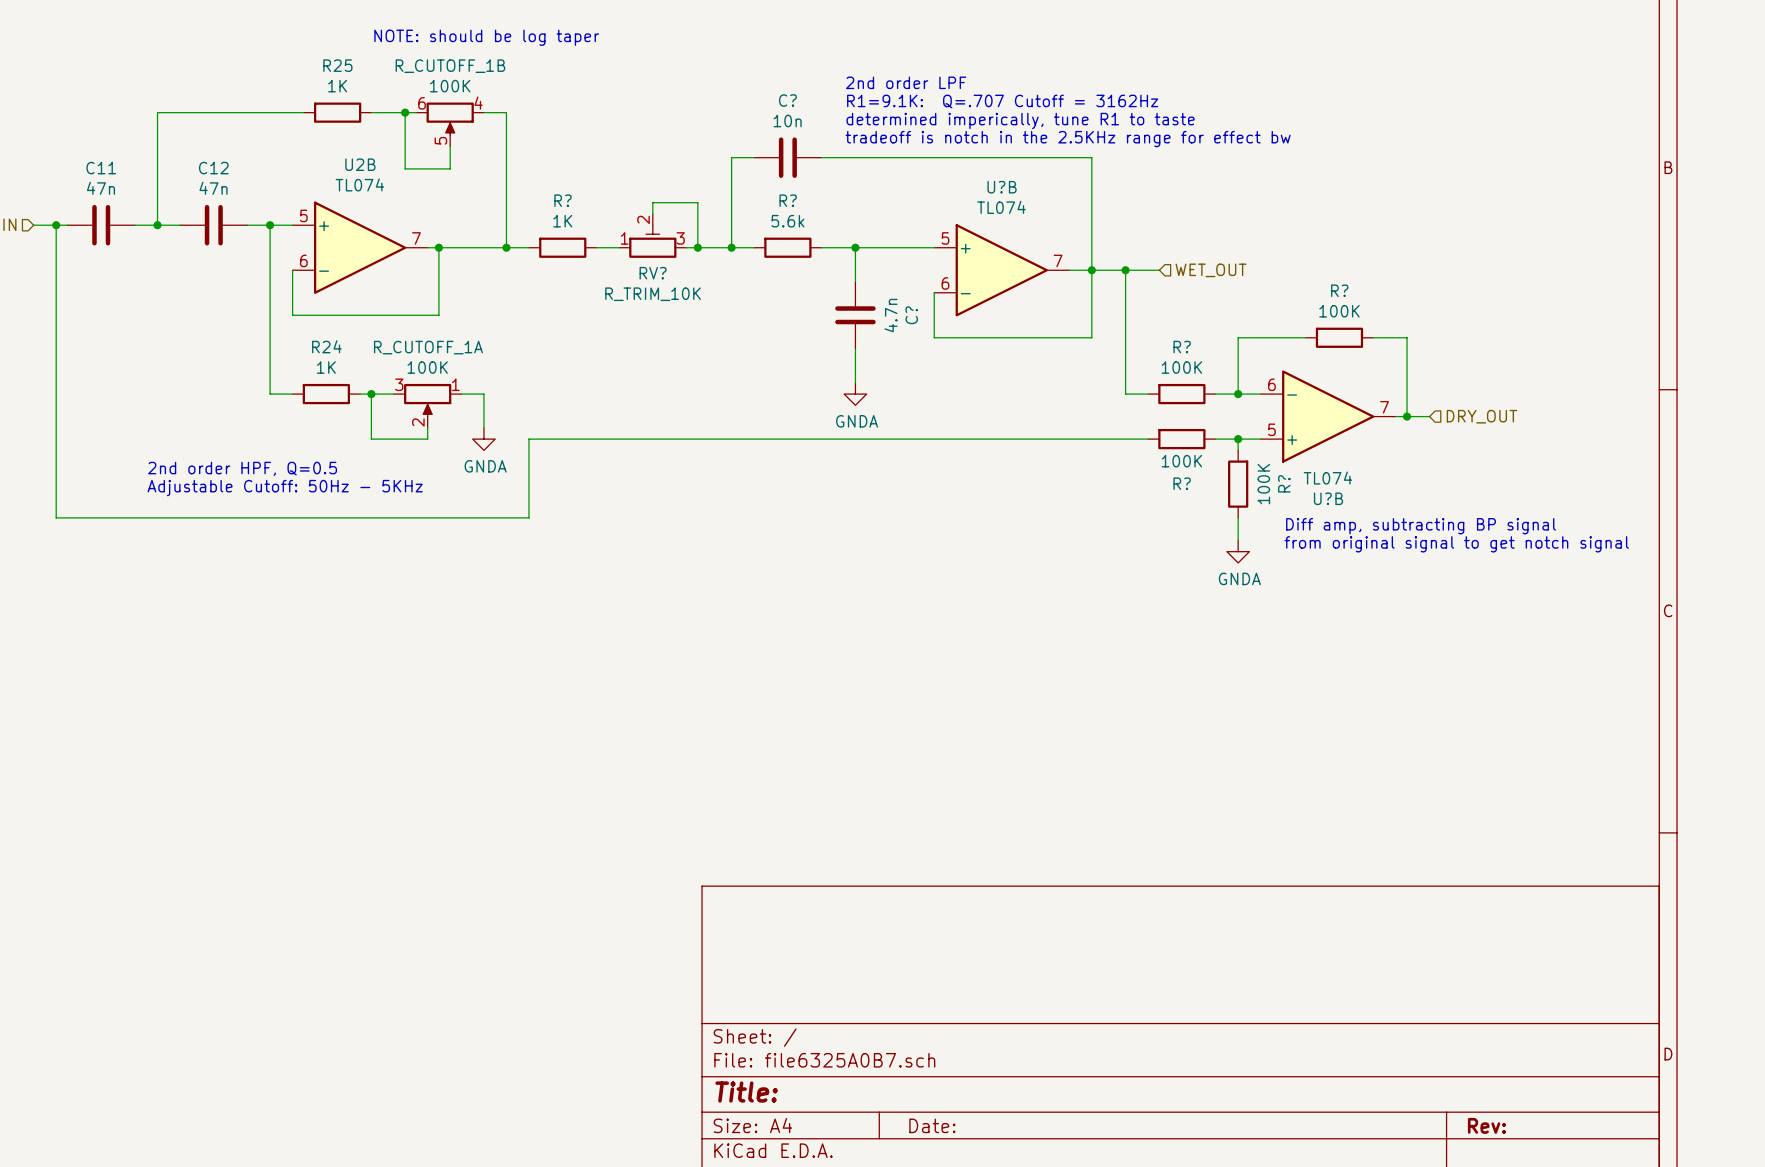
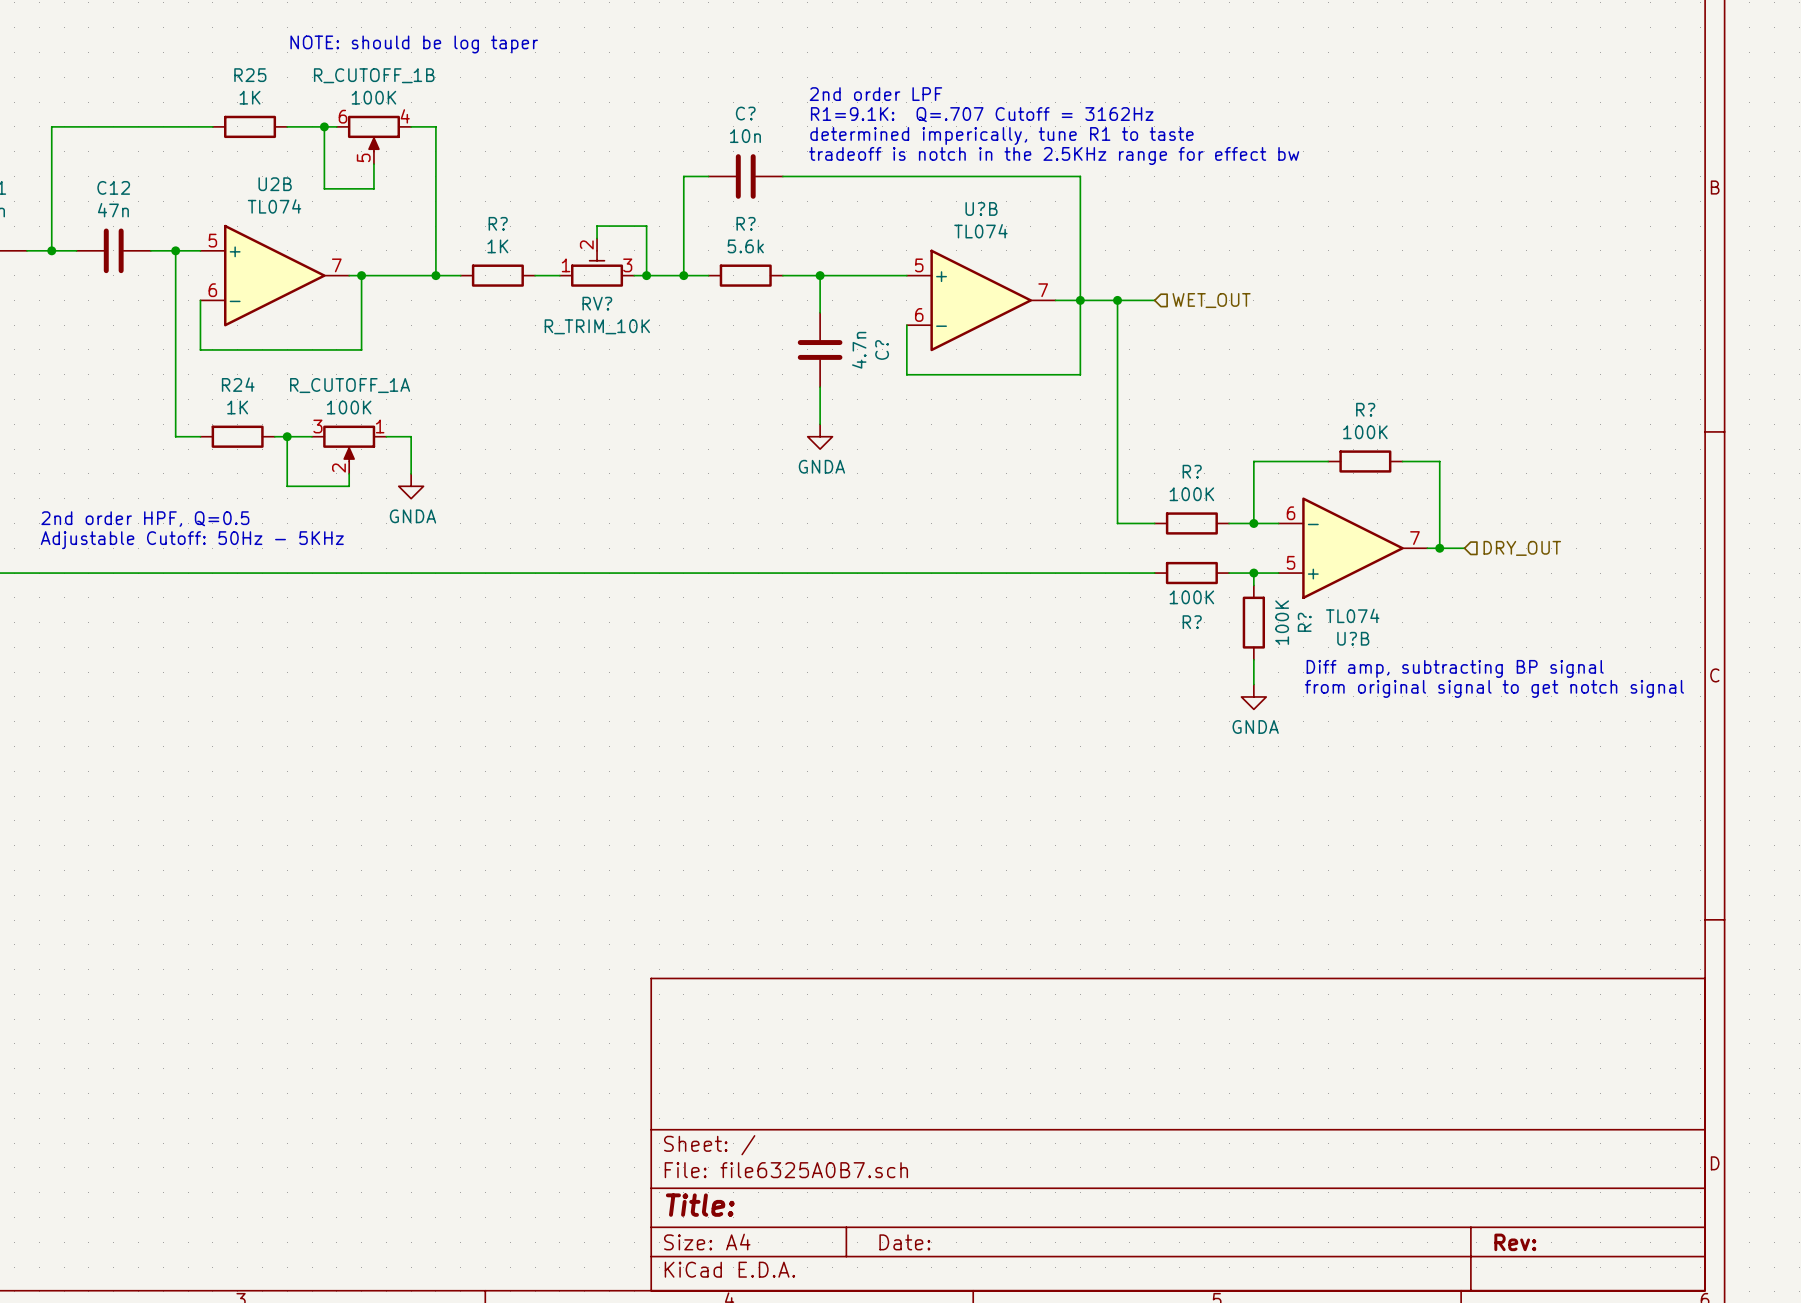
wire: (1305, 337) (1238, 337) (1238, 394) -> (1328, 461) (1253, 461) (1253, 523)
R?: 100K (1339, 337) -> none
wire: (1373, 337) (1407, 337) (1407, 416) -> none
wire: (1125, 394) (1148, 394) -> (1117, 436) (1117, 523) (1154, 523)
R?: 100K (1181, 394) -> none
wire: (1215, 394) (1260, 394) -> (1229, 523) (1278, 523)
junction: (1238, 394) -> none
U?B position: (1328, 416) -> (1353, 548)
R?: none -> 100K (1365, 461)
junction: (1407, 416) -> none
wire: (1418, 416) (1429, 416) -> (1439, 461) (1439, 548)
hierarchical label position: DRY_OUT (1481, 416) -> DRY_OUT (1522, 548)
wire: (1148, 439) (528, 439) (528, 517) -> (1154, 573) (460, 573)
R?: 100K (1181, 439) -> none
wire: (1215, 439) (1260, 439) -> (1229, 573) (1278, 573)
wire: (1238, 439) (1238, 450) -> (1253, 573) (1253, 585)
junction position: (1238, 439) -> (1253, 523)
R?: none -> 100K (1191, 523)
R?: 100K (1238, 484) -> none
wire: none -> (1427, 548) (1464, 548)
junction: none -> (1439, 548)
R?: none -> 100K (1191, 573)
wire: (1238, 517) (1238, 540) -> (1253, 659) (1253, 684)
junction: none -> (1253, 573)
text position: Diff amp, subtracting BP signal (1421, 526) -> Diff amp, subtracting BP signal (1455, 668)
text position: from original signal to get notch signal (1456, 544) -> from original signal to get notch signal (1494, 688)
power symbol position: GNDA (1238, 551) -> GNDA (1253, 696)
R?: none -> 100K (1253, 622)

